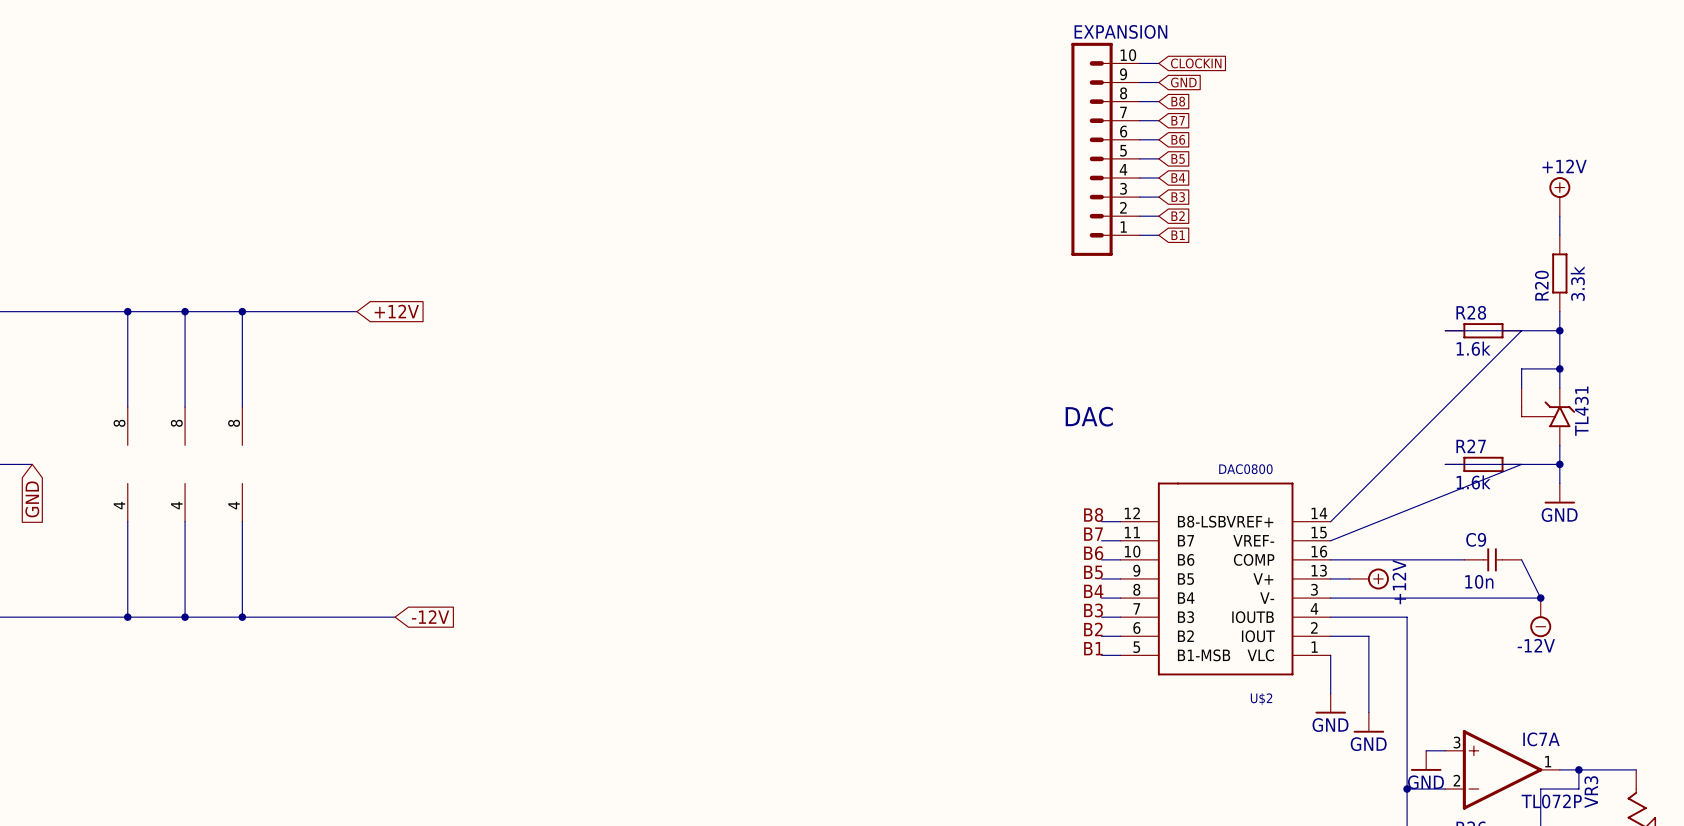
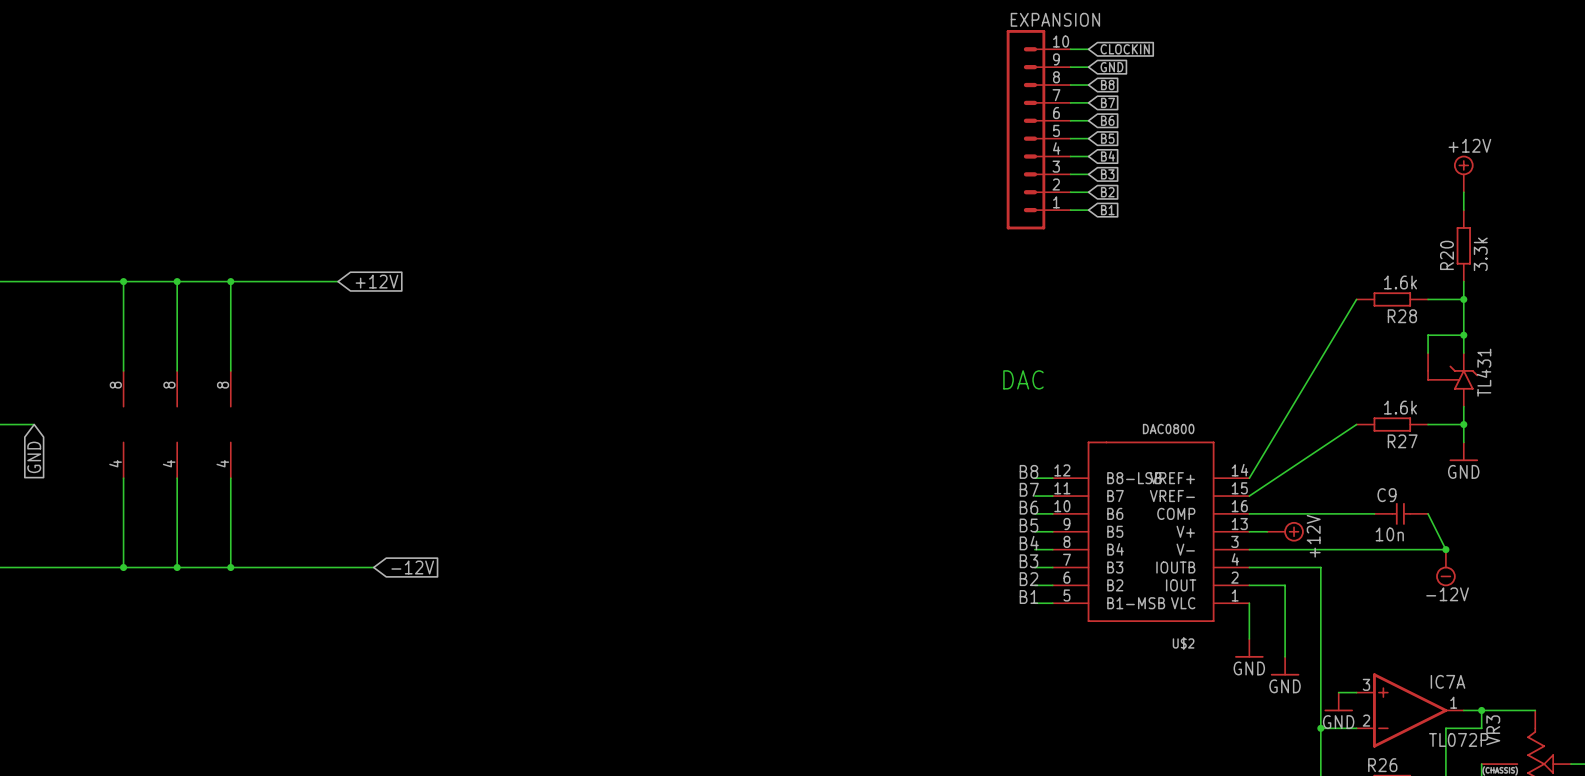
R28 name position: R28 (1471, 312) -> R28 (1402, 316)
wire: (1445, 330) (1521, 330) (1330, 521) -> (1356, 299) (1249, 478)
R28 value position: 1.6k (1473, 348) -> 1.6k (1400, 282)
R27 name position: R27 (1471, 446) -> R27 (1402, 441)
wire: (1445, 464) (1521, 464) (1330, 540) -> (1356, 424) (1249, 496)
R27 value position: 1.6k (1473, 482) -> 1.6k (1400, 407)

